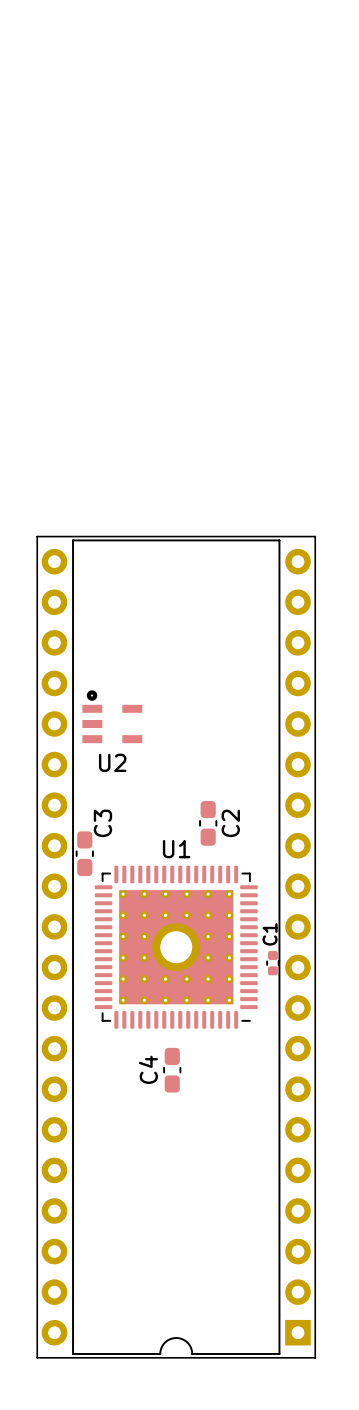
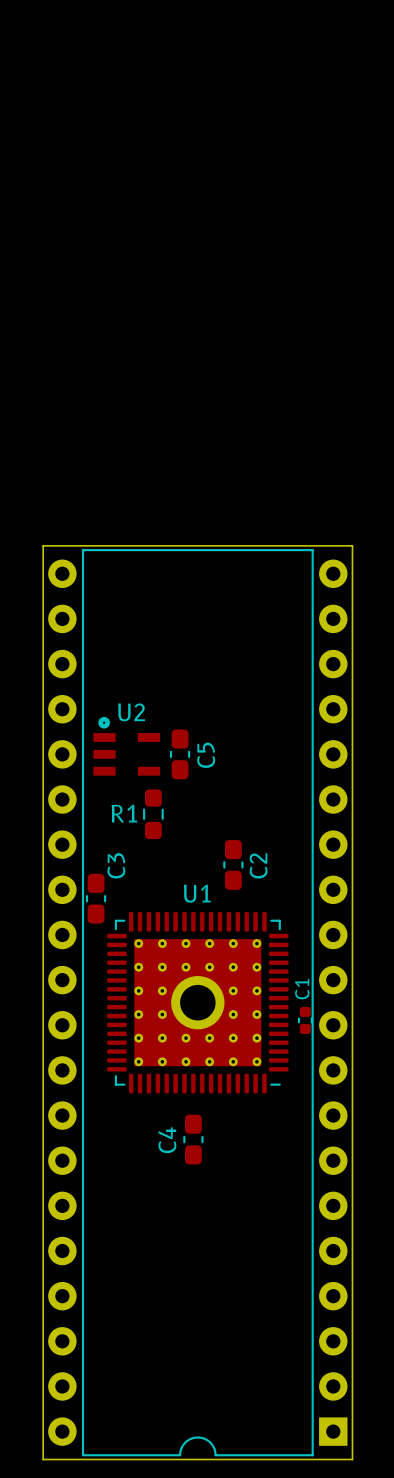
C5: none -> (180, 754)
U2 name position: U2 (112, 762) -> U2 (131, 712)
R1: none -> (153, 814)

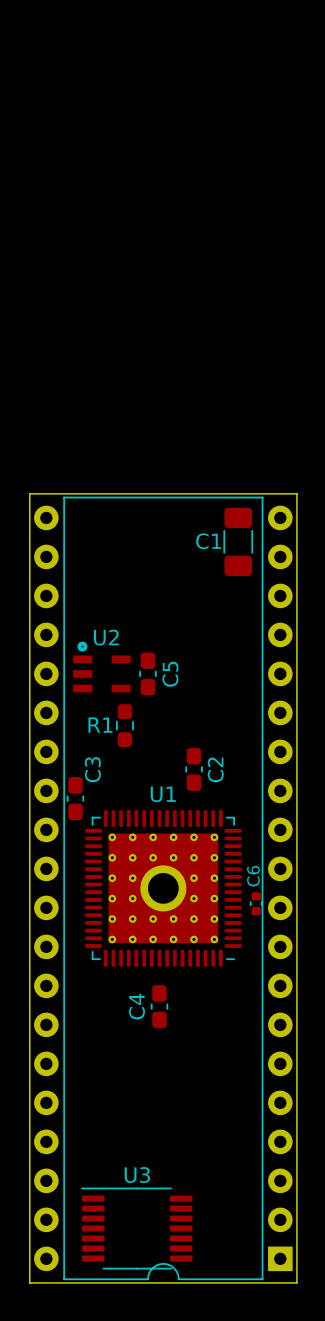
C1: none -> (238, 541)
C1 name: C1 (302, 989) -> C6 (253, 876)
U3: none -> (136, 1228)

